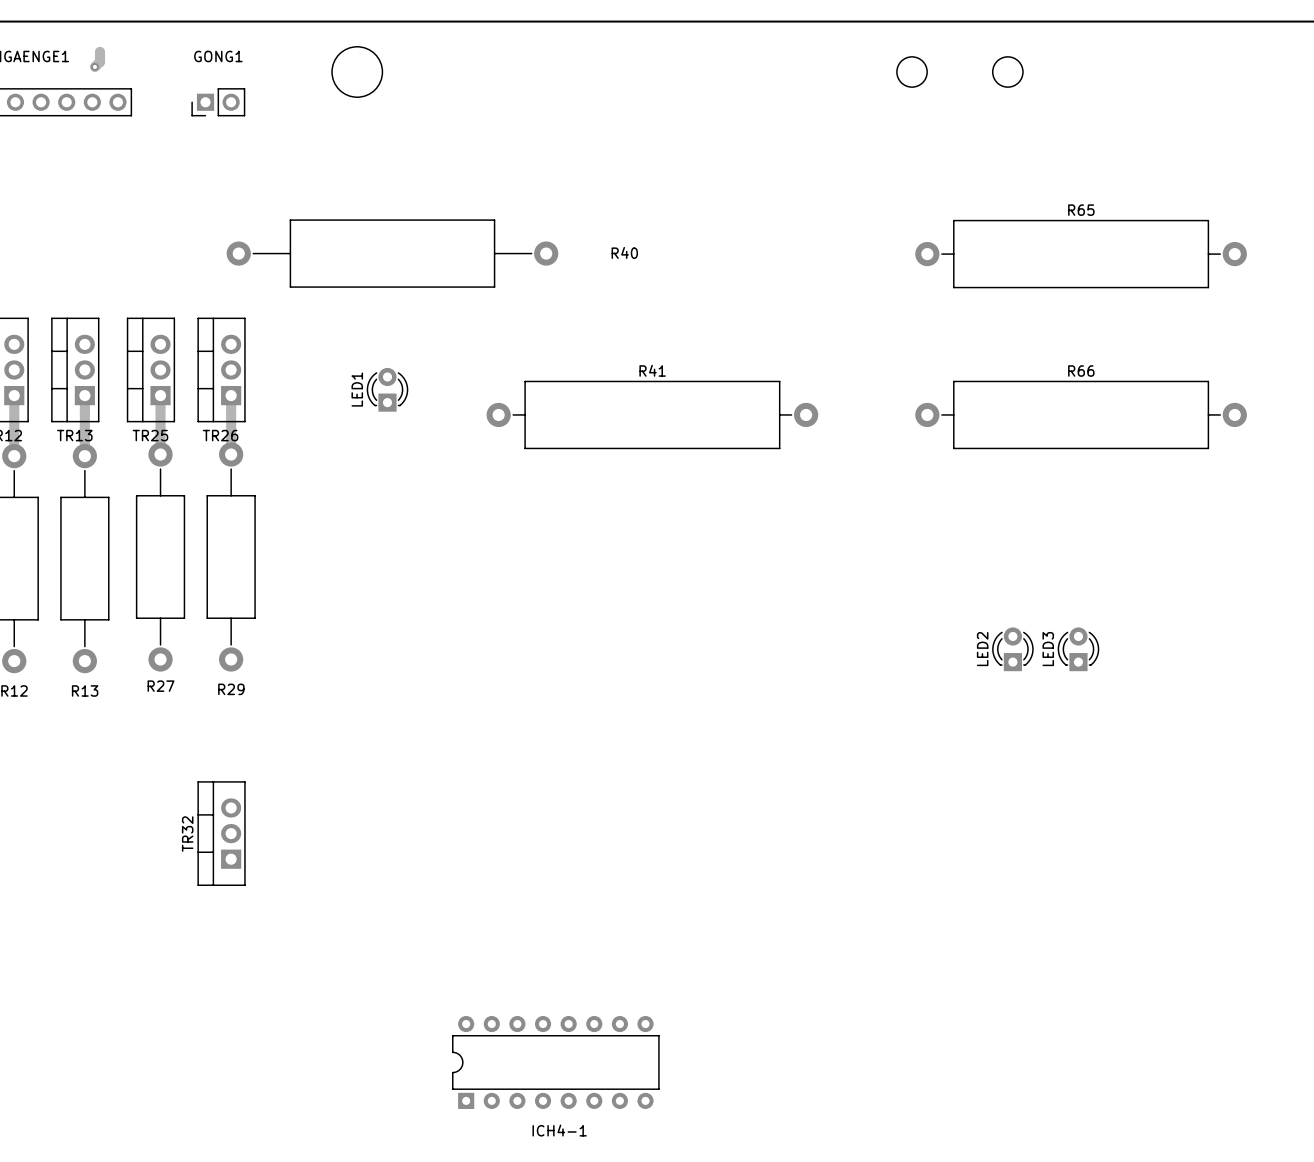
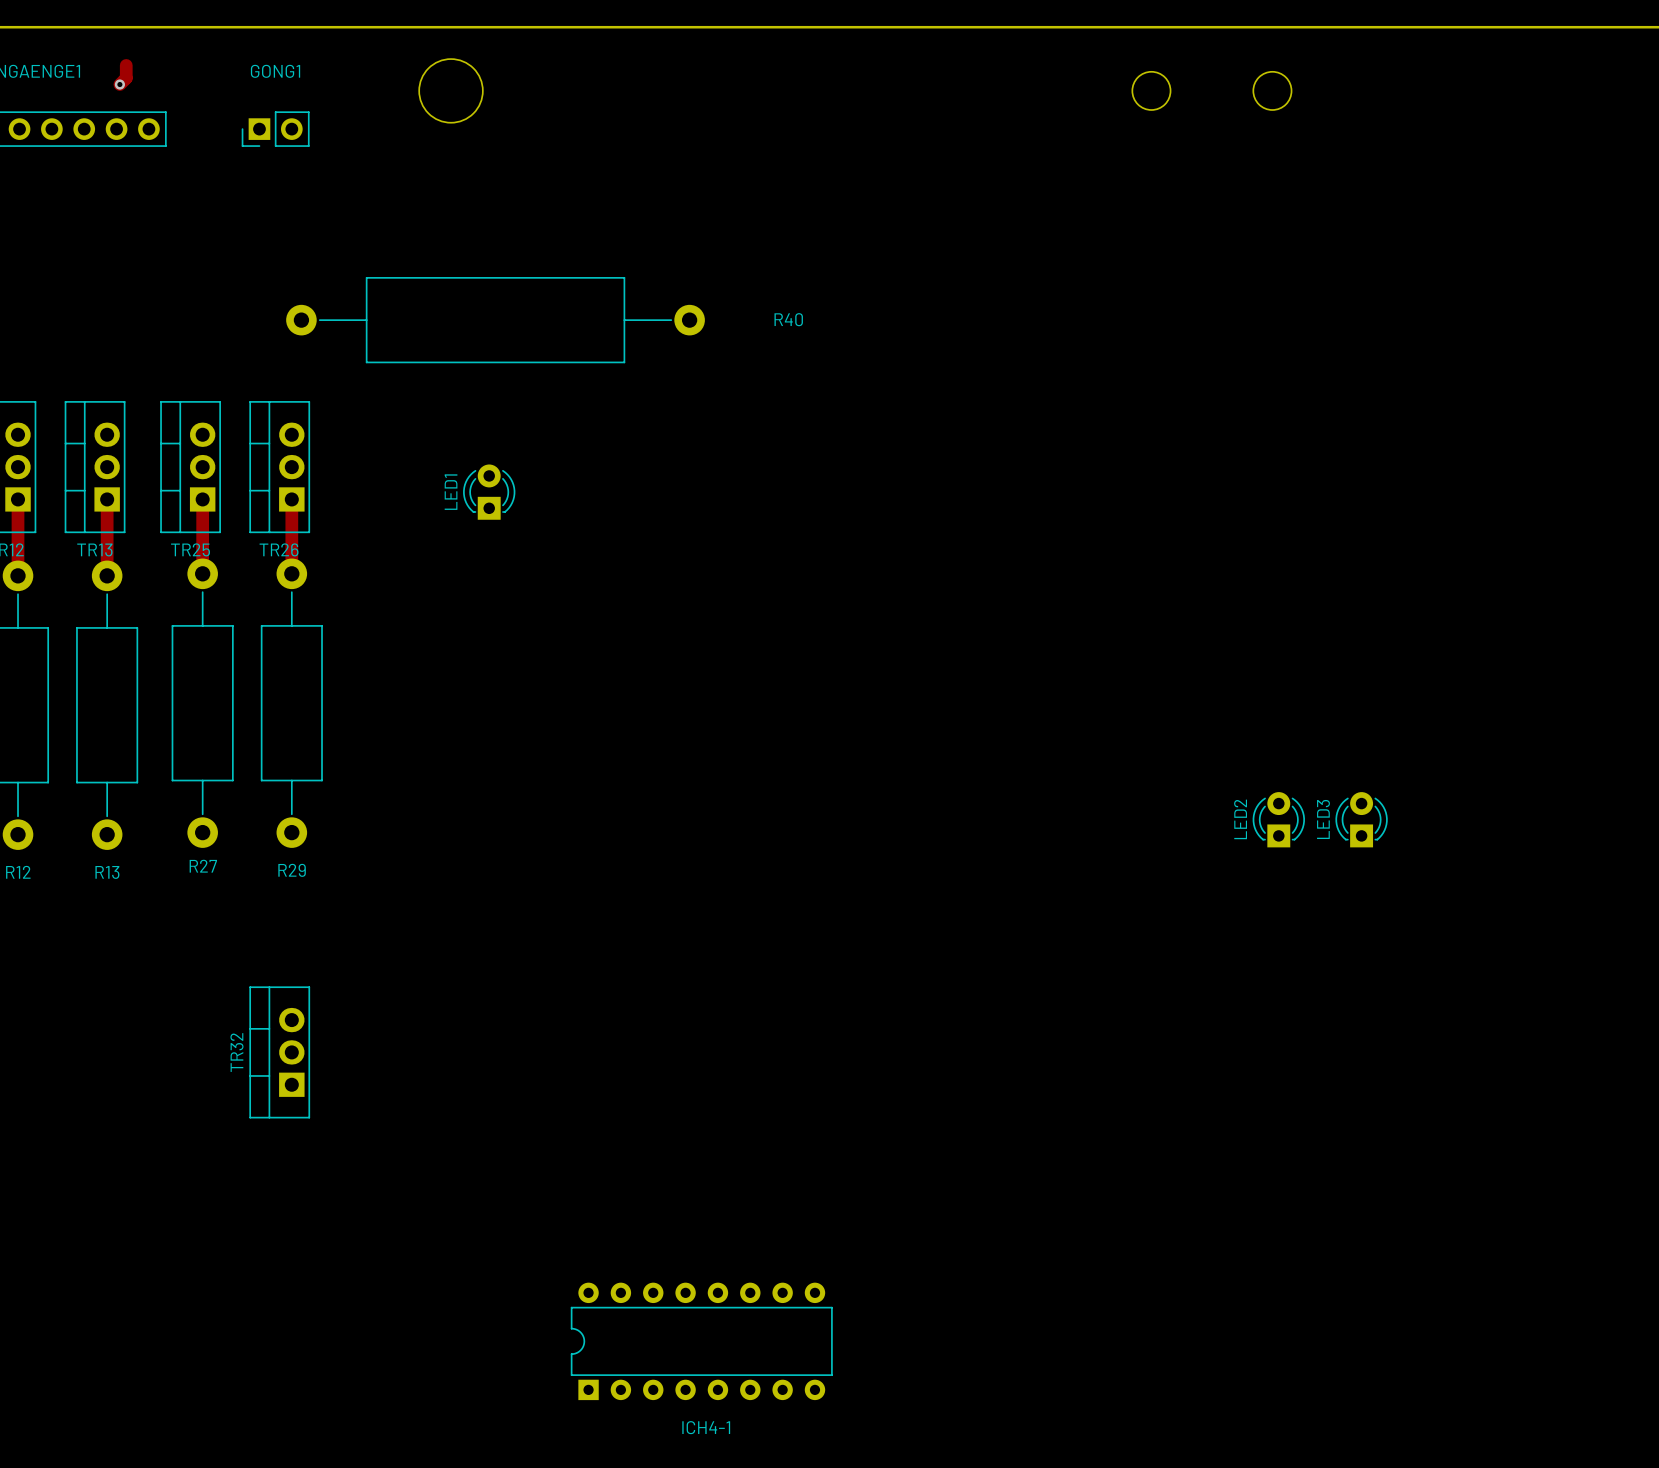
R65: (1081, 254) -> none
R41: (652, 414) -> none
R66: (1081, 414) -> none

